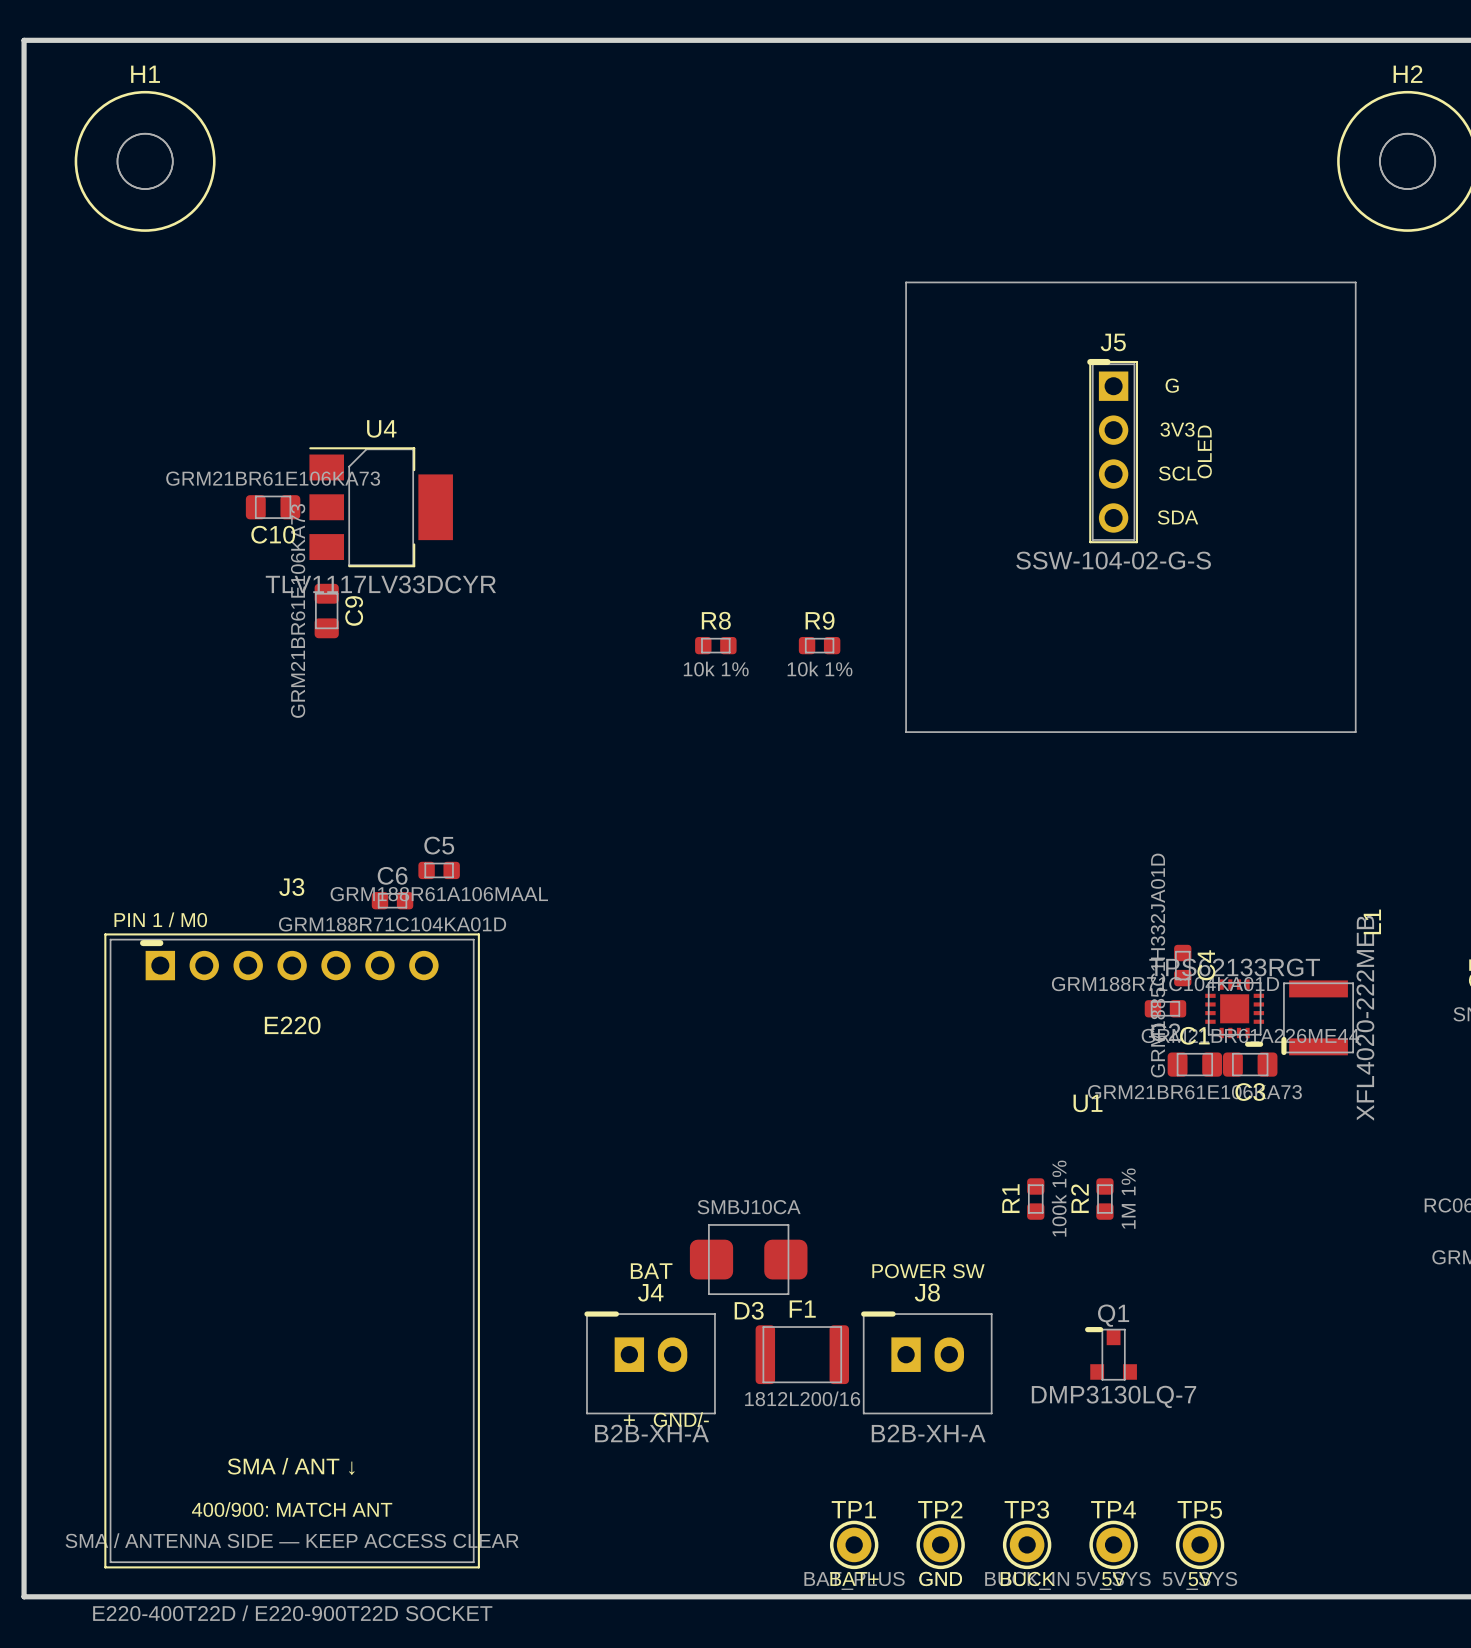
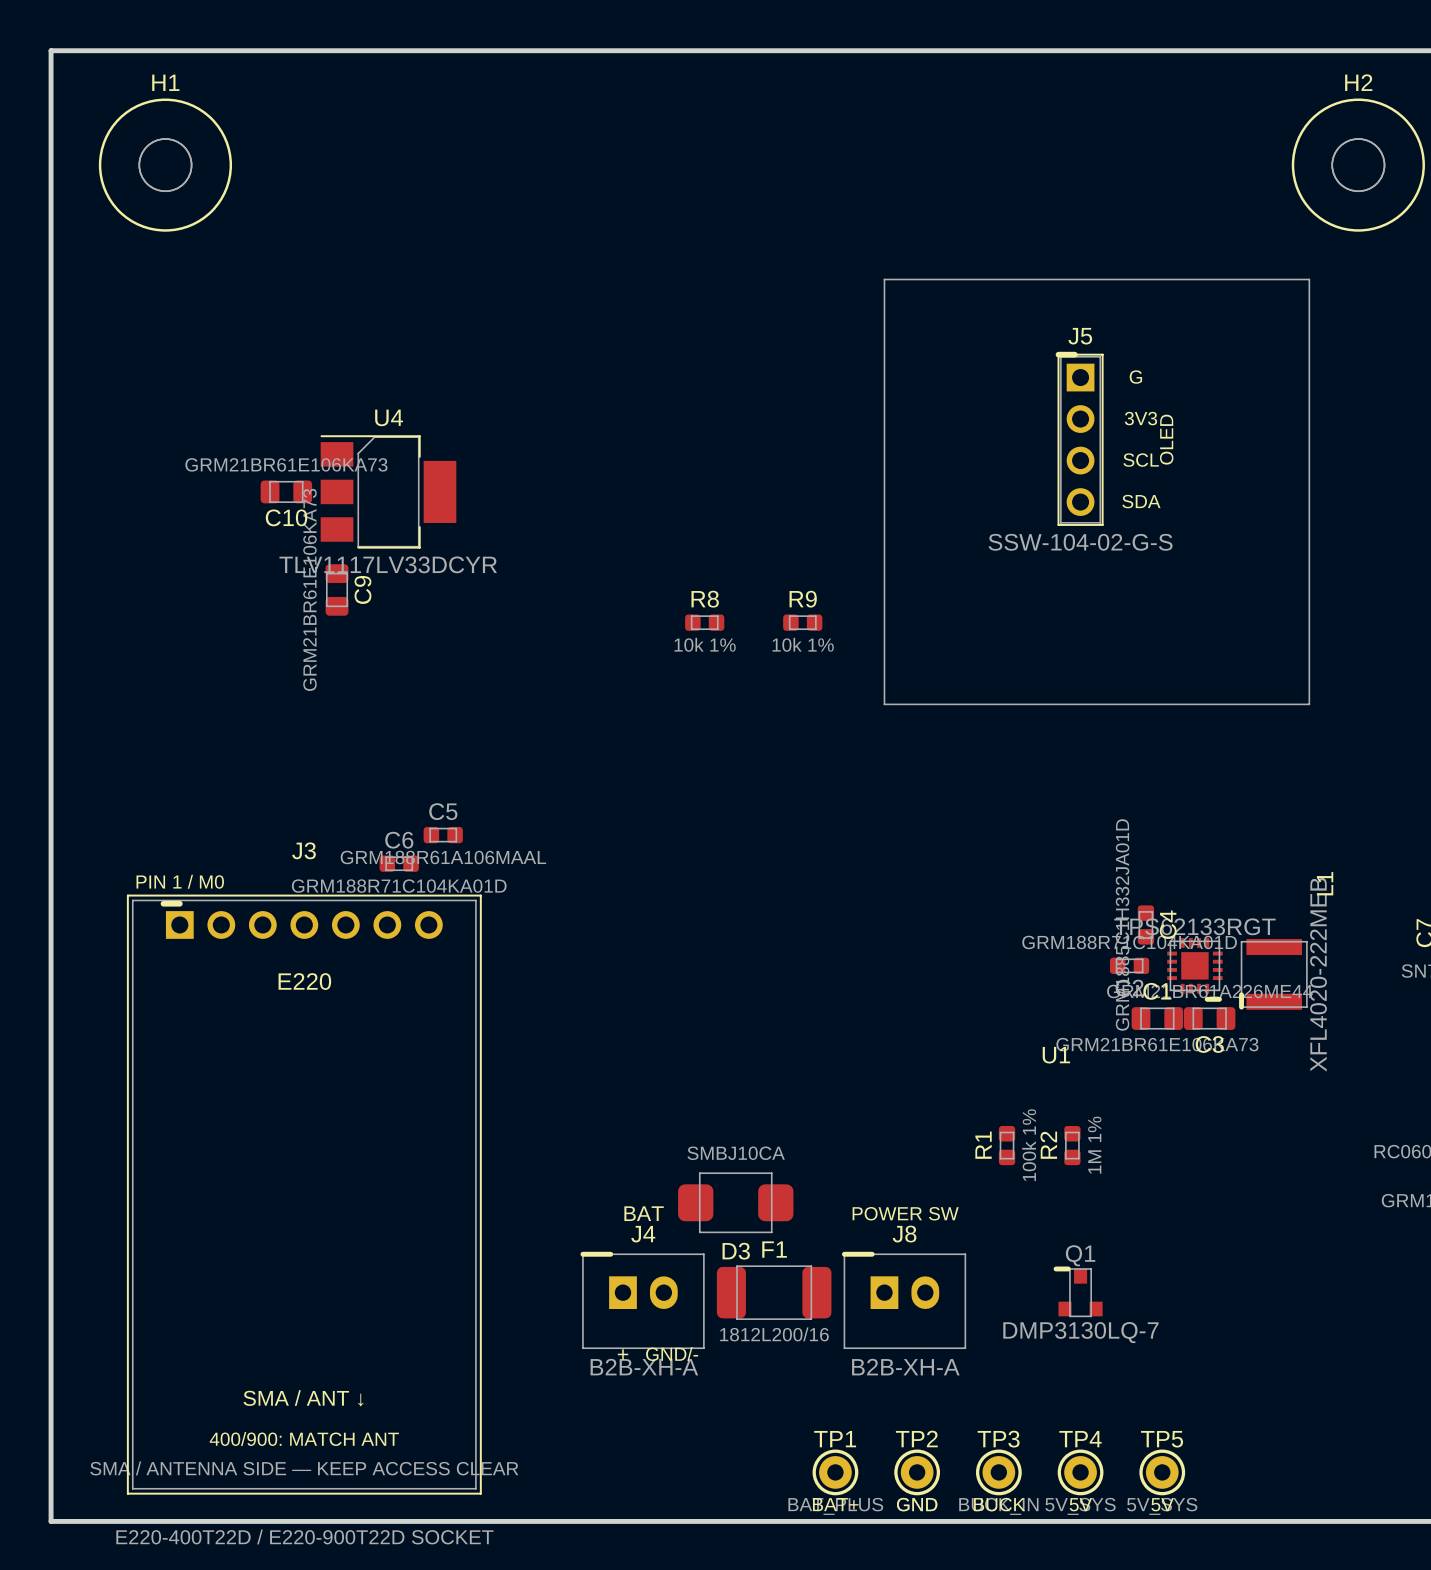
D3 footprint: [689, 1224, 808, 1296] -> [678, 1172, 794, 1234]
F1 footprint: [755, 1325, 850, 1385] -> [716, 1265, 832, 1320]

